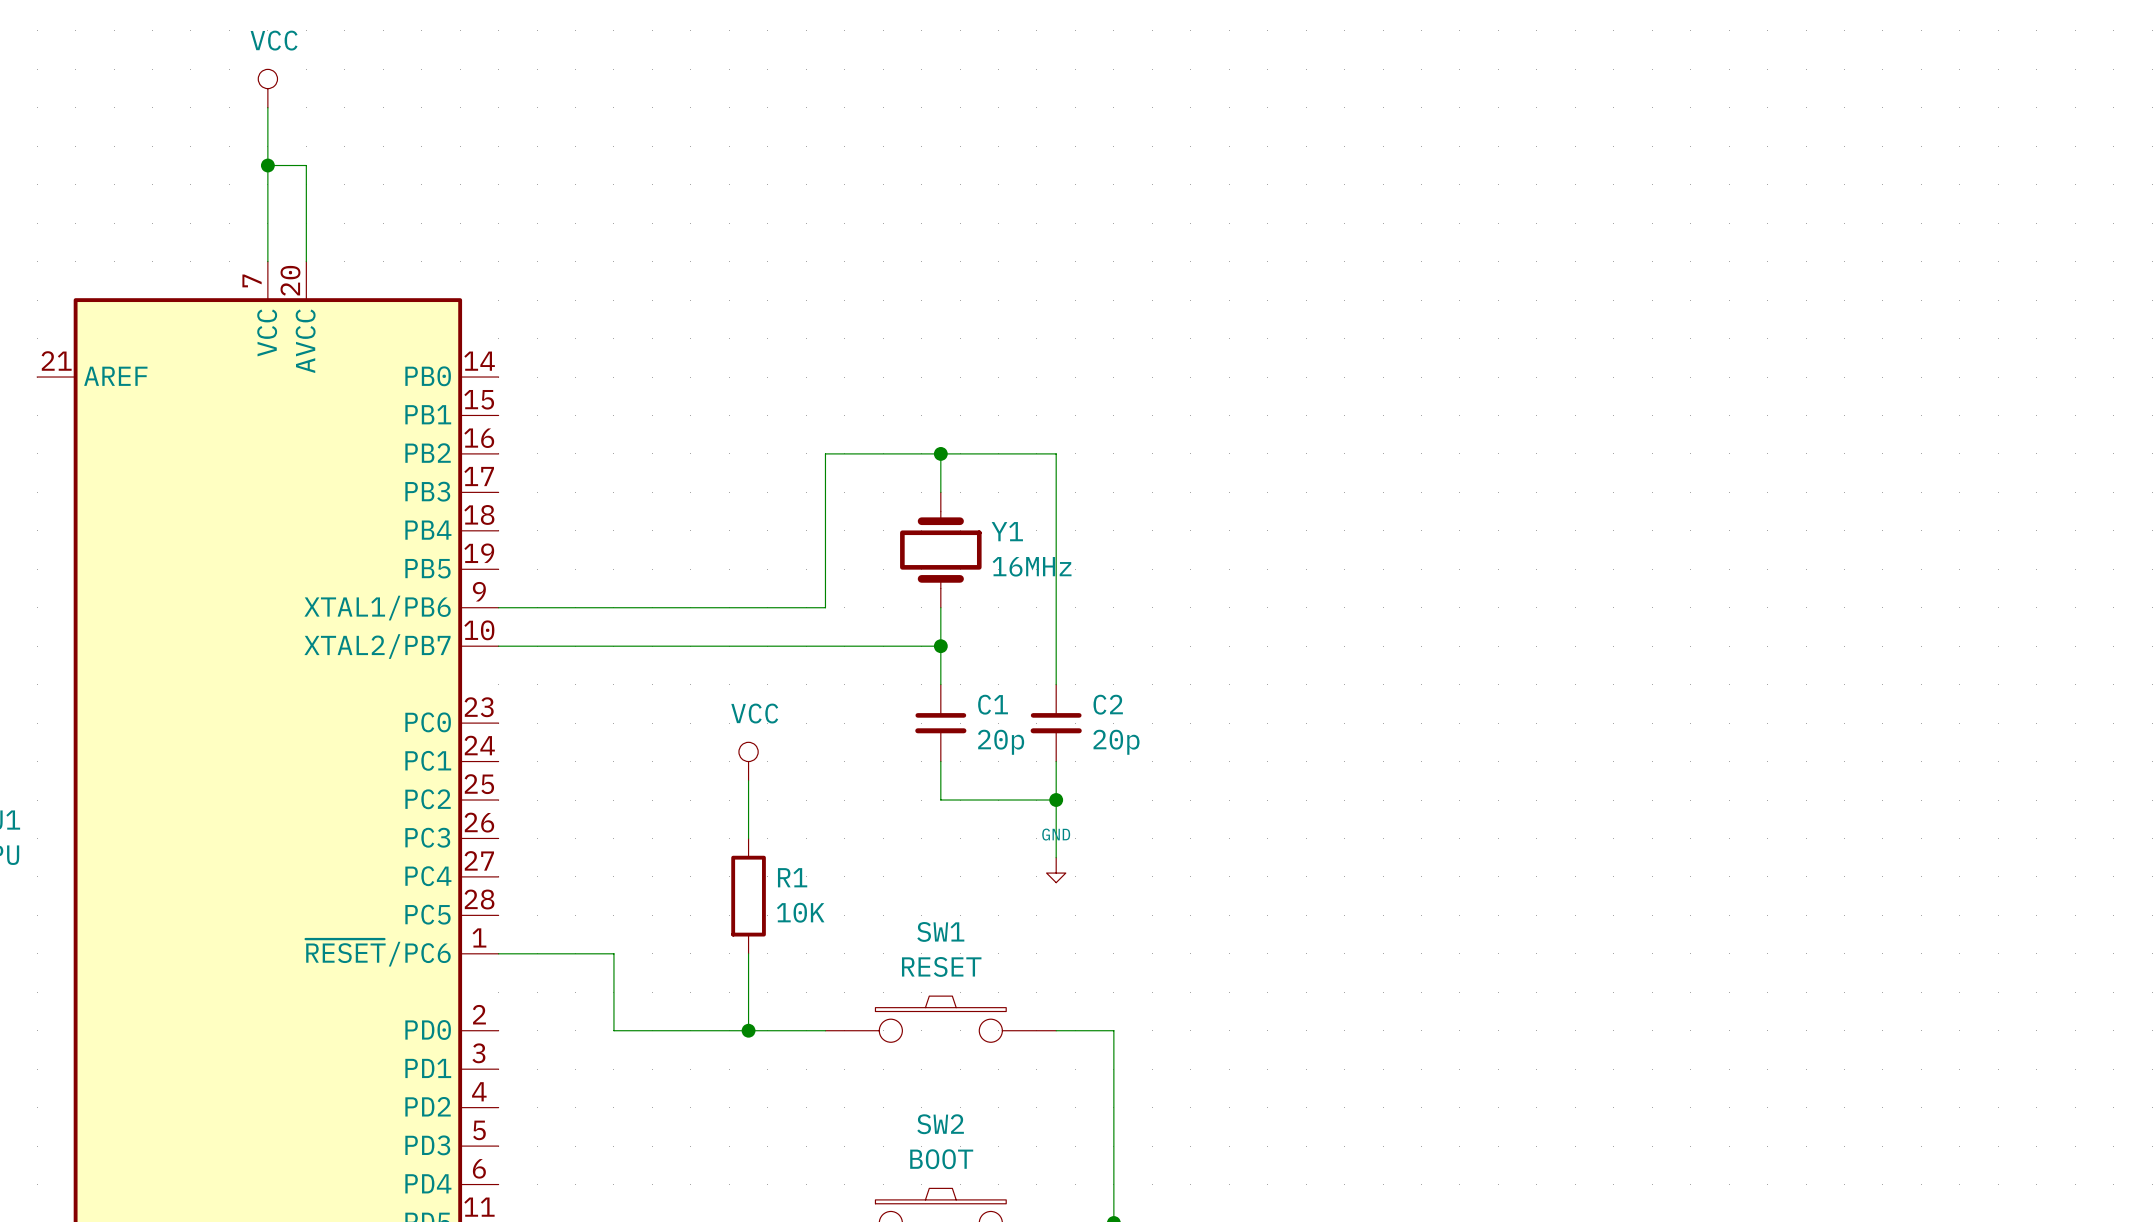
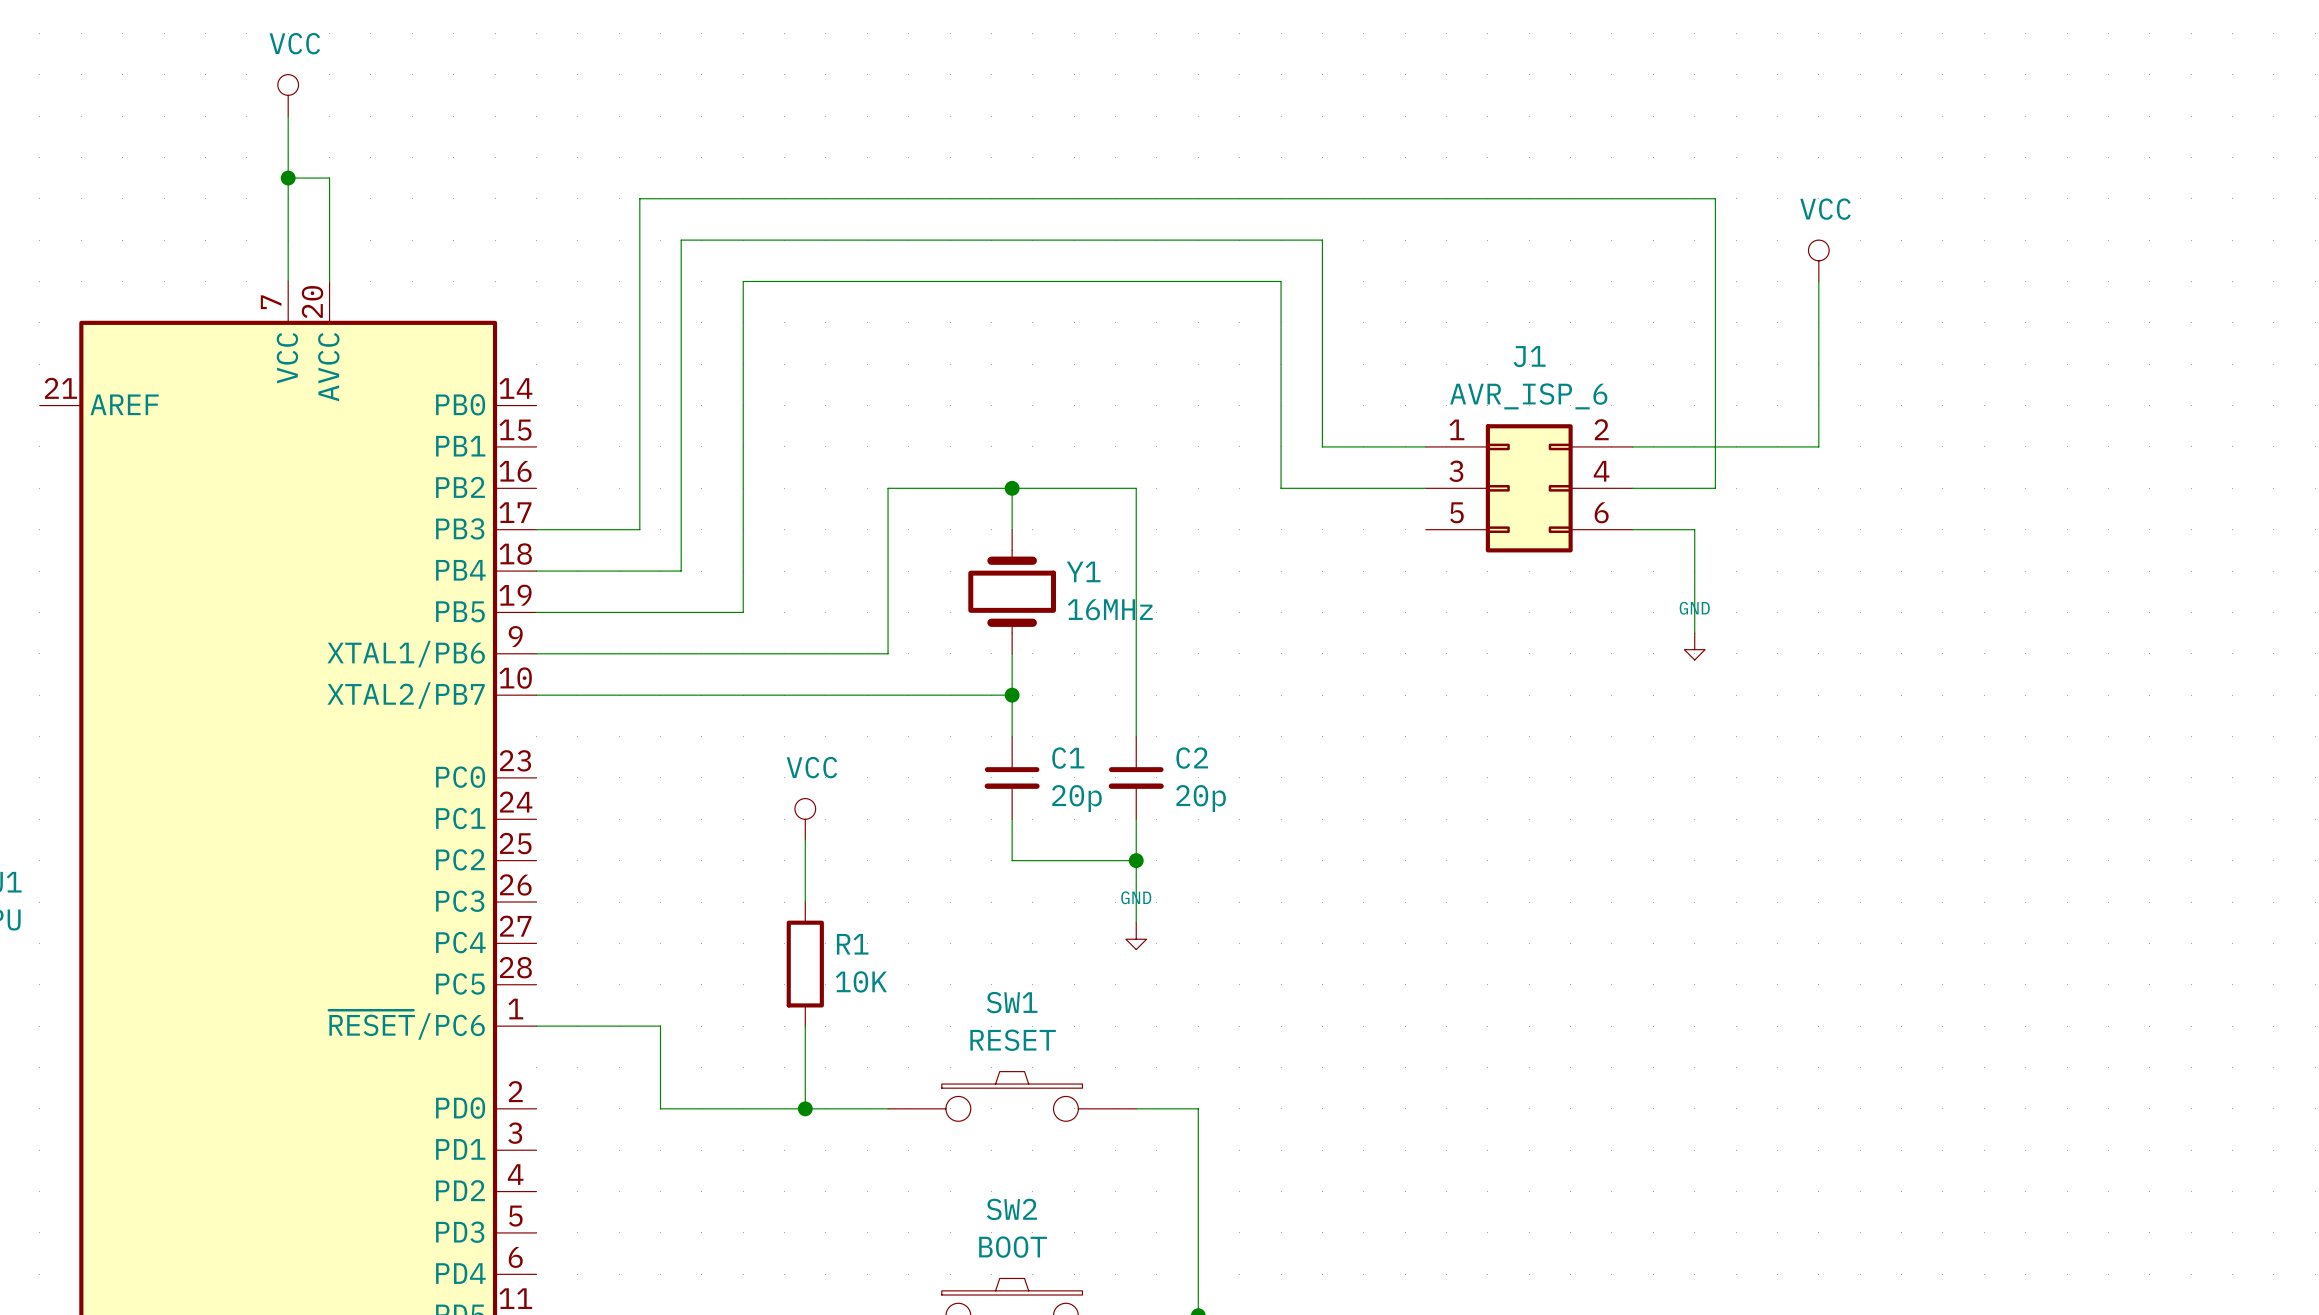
power symbol: none -> VCC (1818, 260)
wire: none -> (1818, 281) (1818, 446) (1632, 446)
wire: none -> (1425, 446) (1322, 446) (1322, 240) (681, 240) (681, 571) (536, 571)
wire: none -> (1425, 488) (1281, 488) (1281, 281) (743, 281) (743, 612) (536, 612)
J1: none -> AVR_ISP_6 (1529, 488)
wire: none -> (1632, 488) (1715, 488) (1715, 198) (639, 198) (639, 529) (536, 529)
wire: none -> (1632, 529) (1694, 529) (1694, 633)
power symbol: none -> GND (1694, 646)

